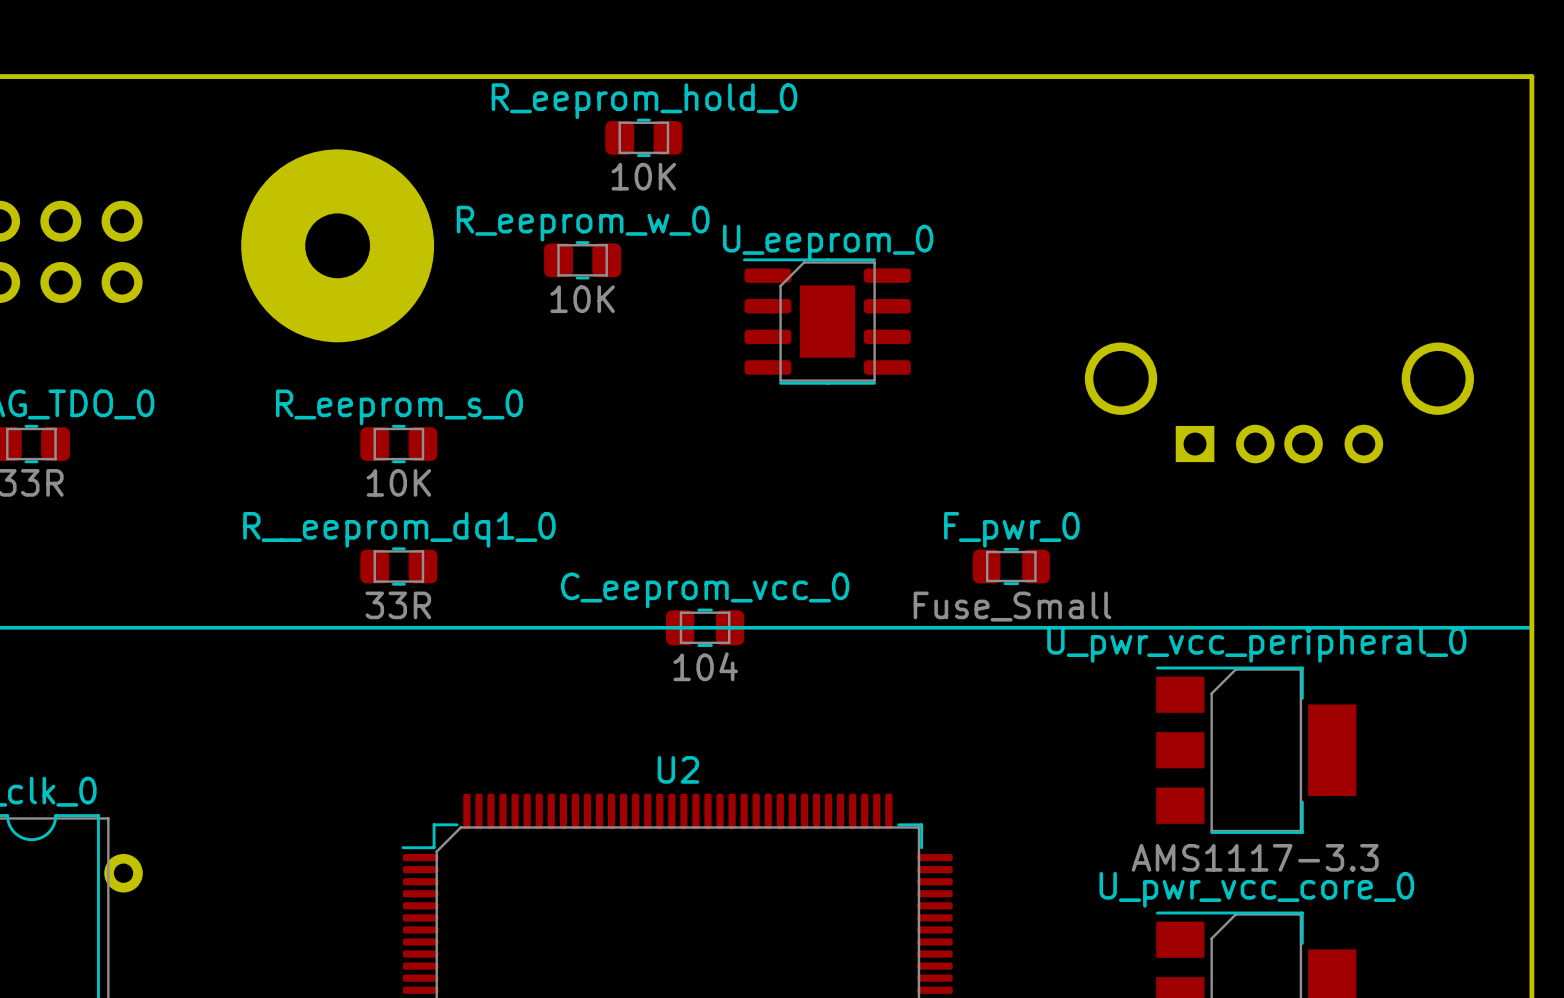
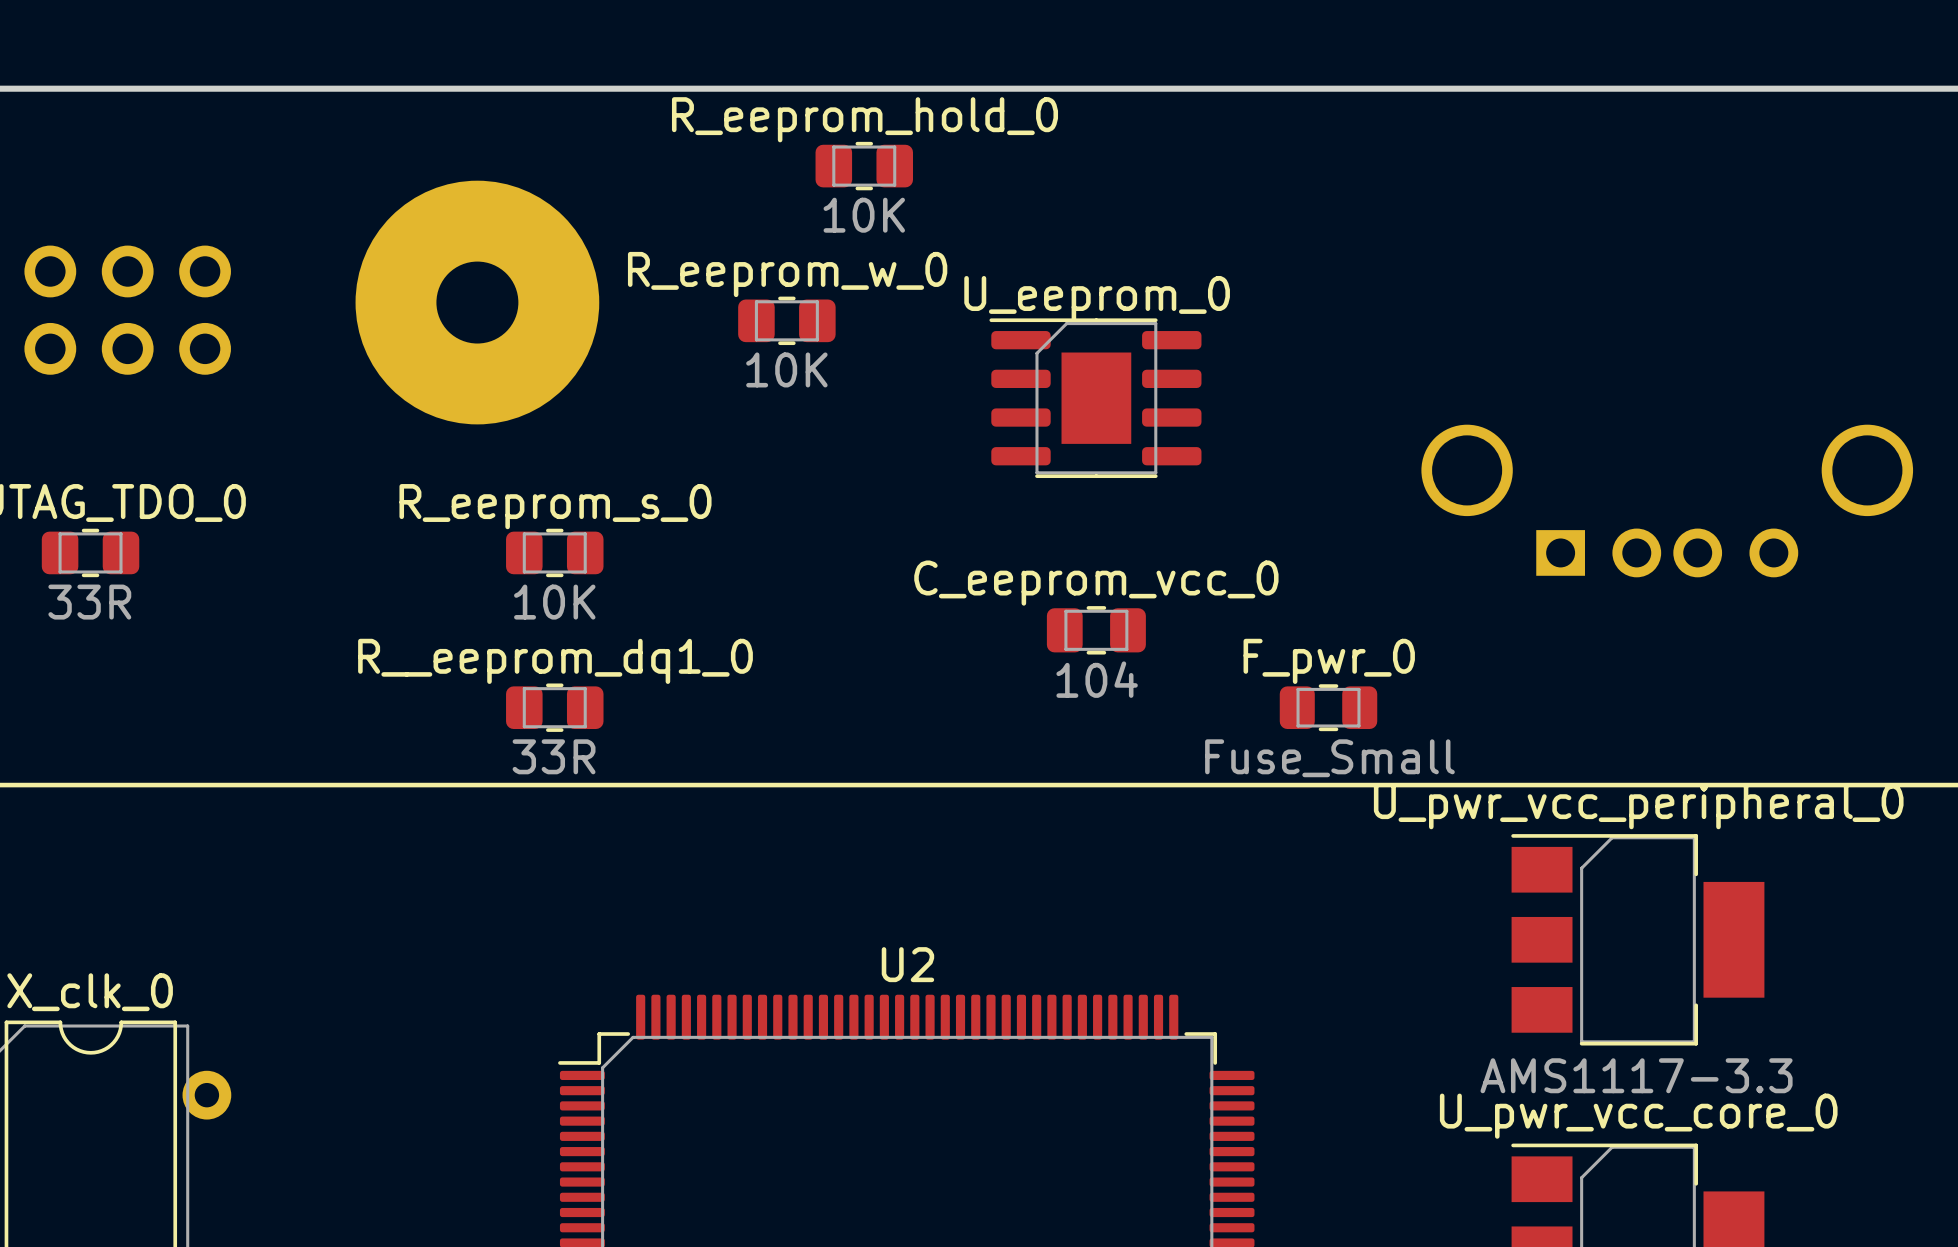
C_eeprom_vcc_0 position: (705, 627) -> (1096, 630)

